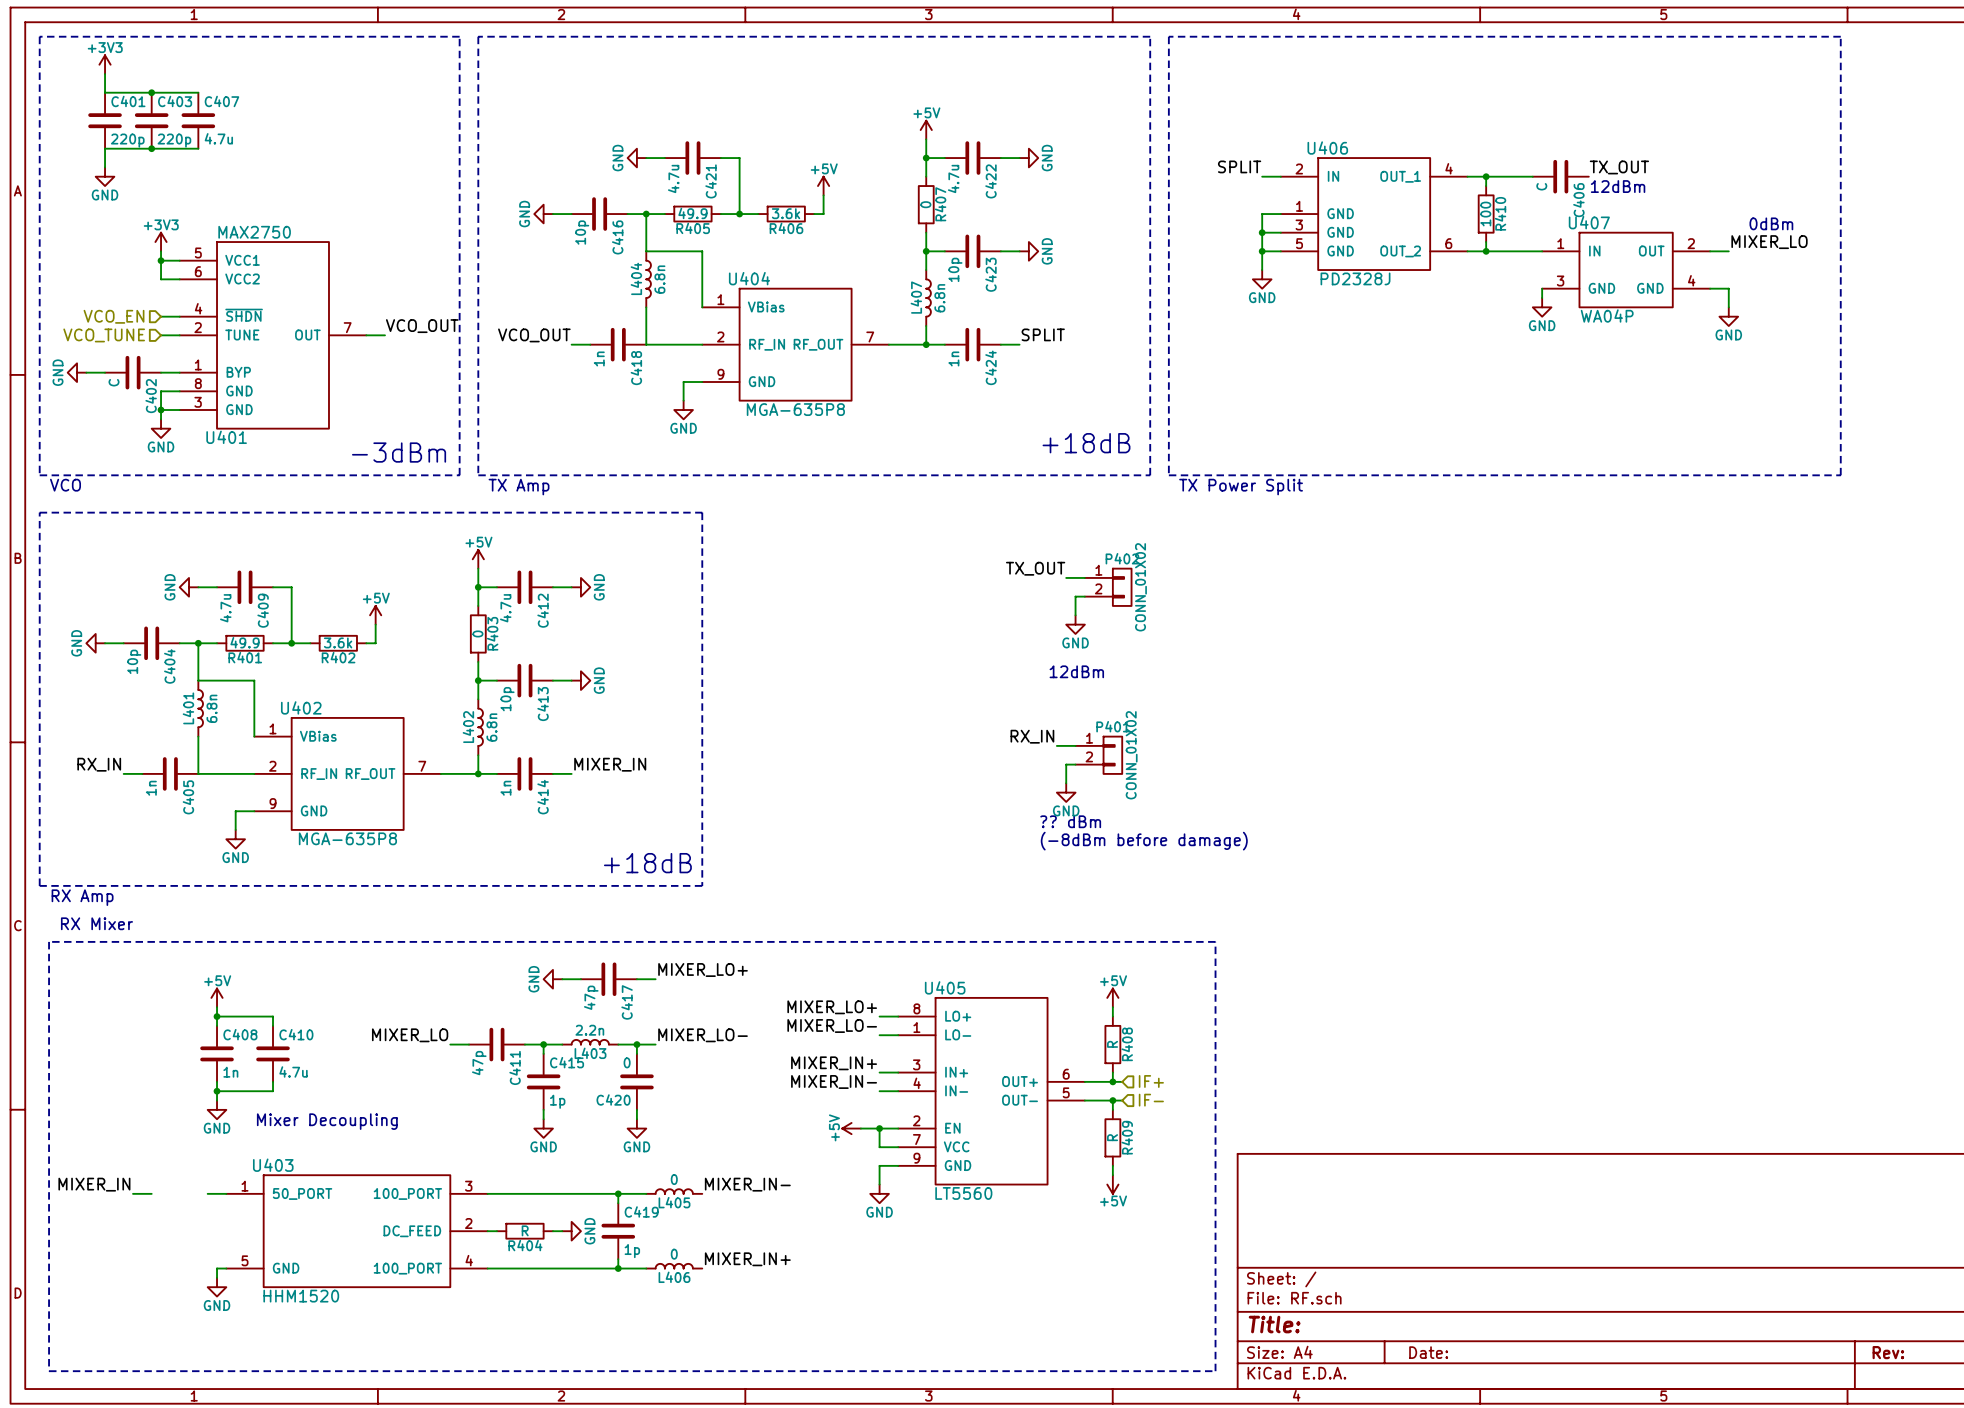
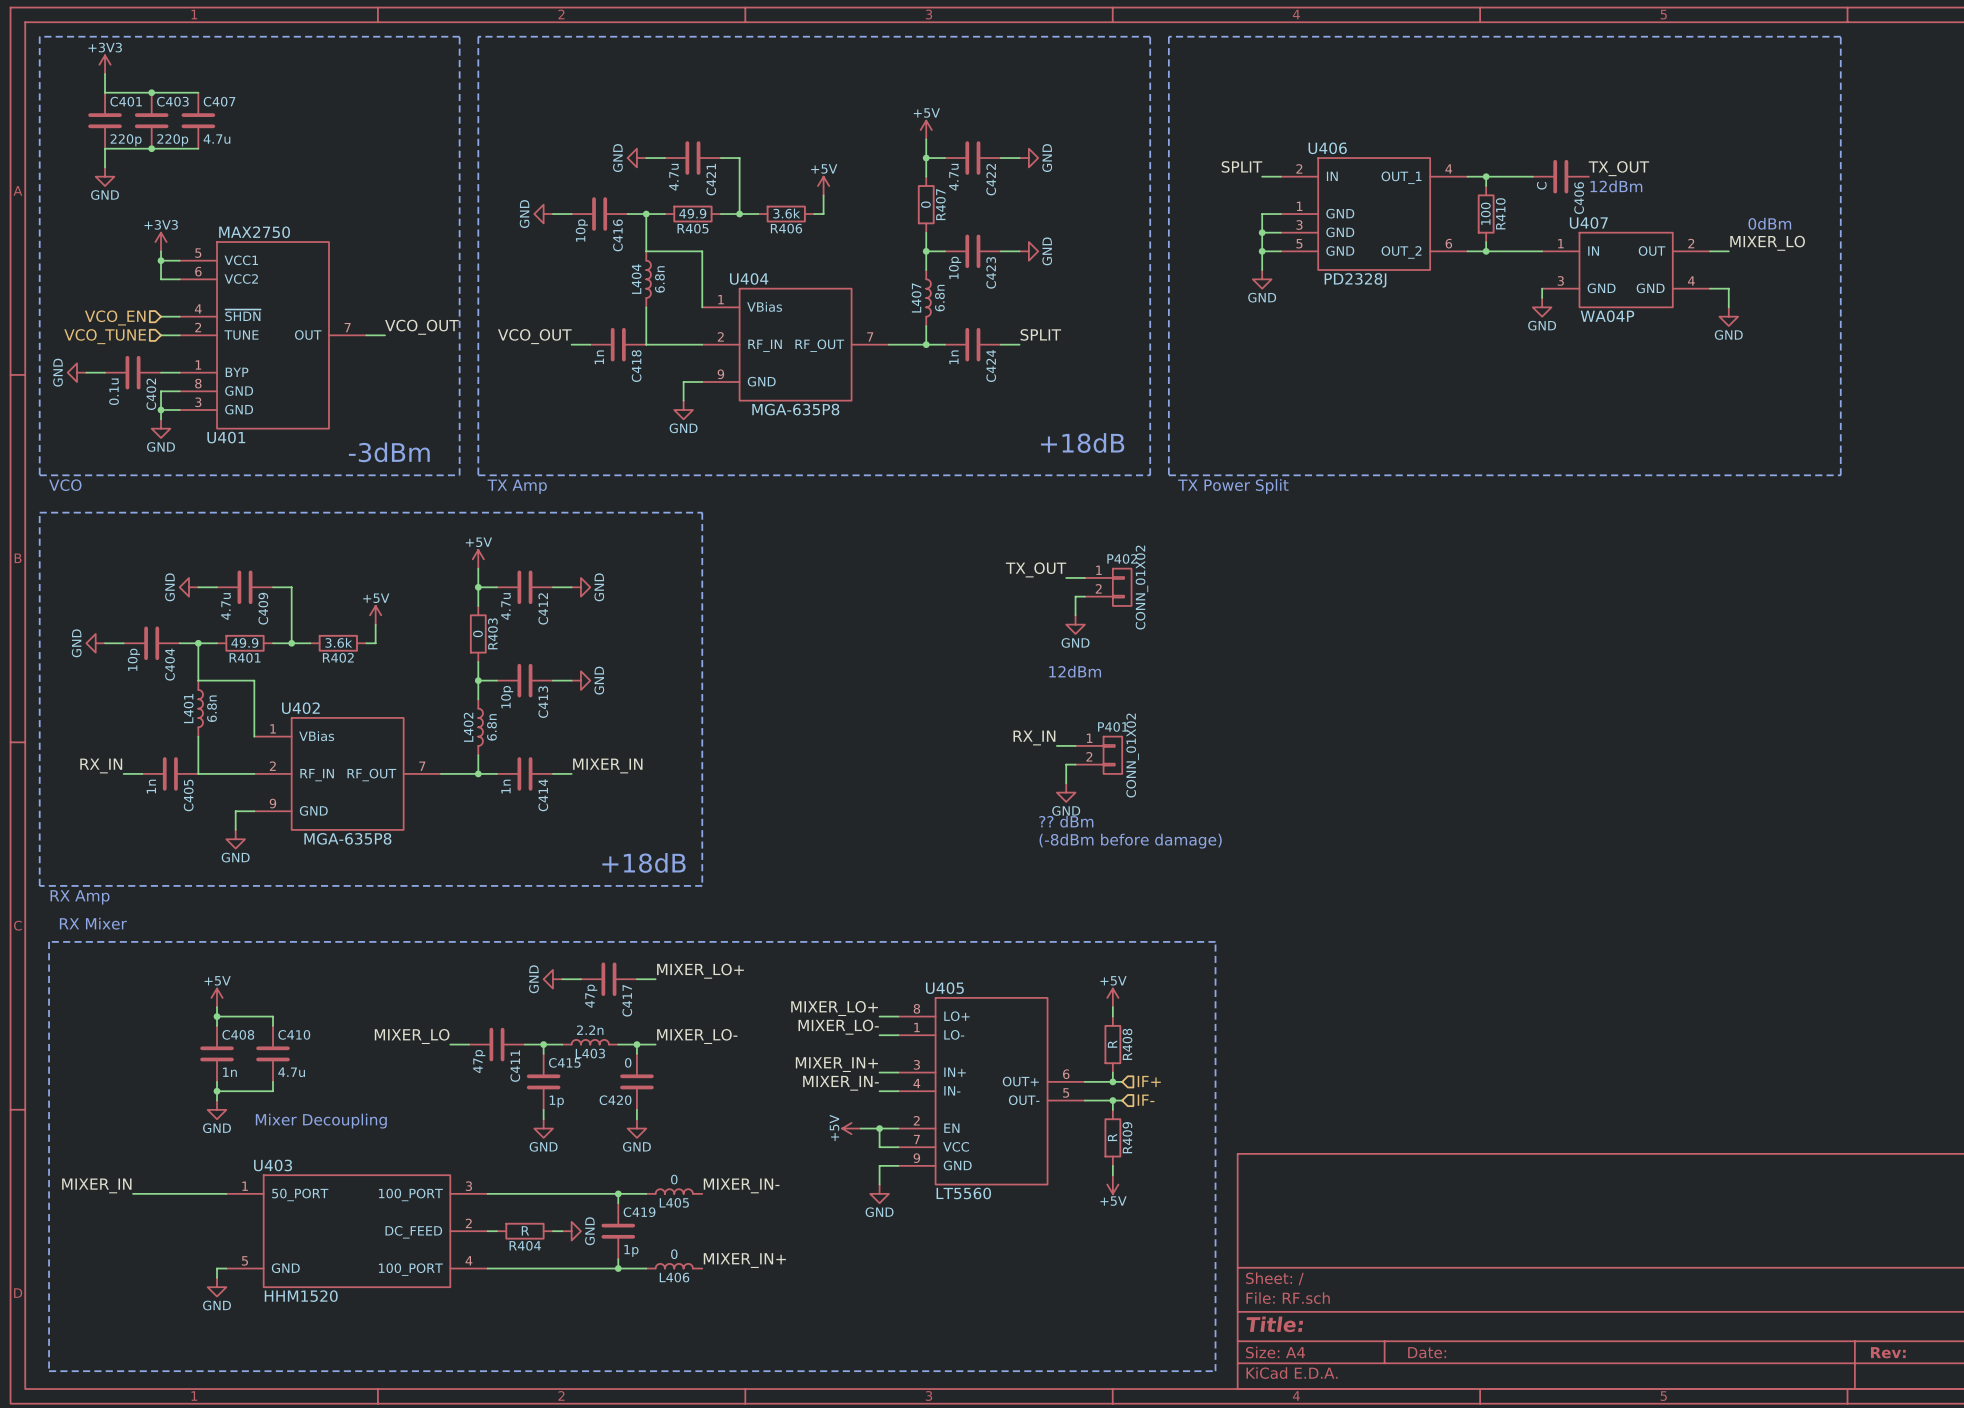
C402 value: C (114, 382) -> 0.1u (114, 391)
wire: none -> (151, 1193) (207, 1193)

